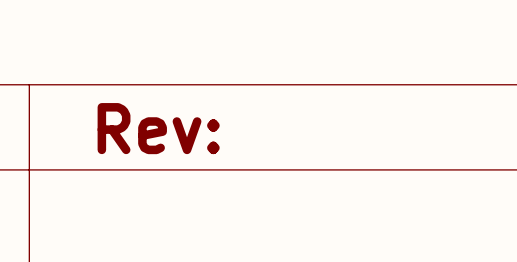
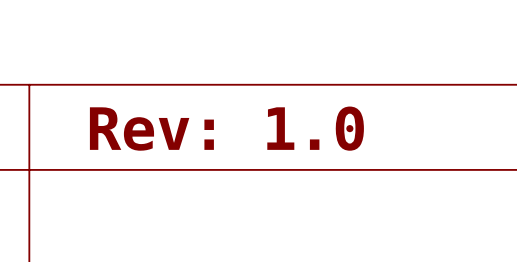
title block: Rev: (158, 128) -> Rev: 1.0 (226, 128)

